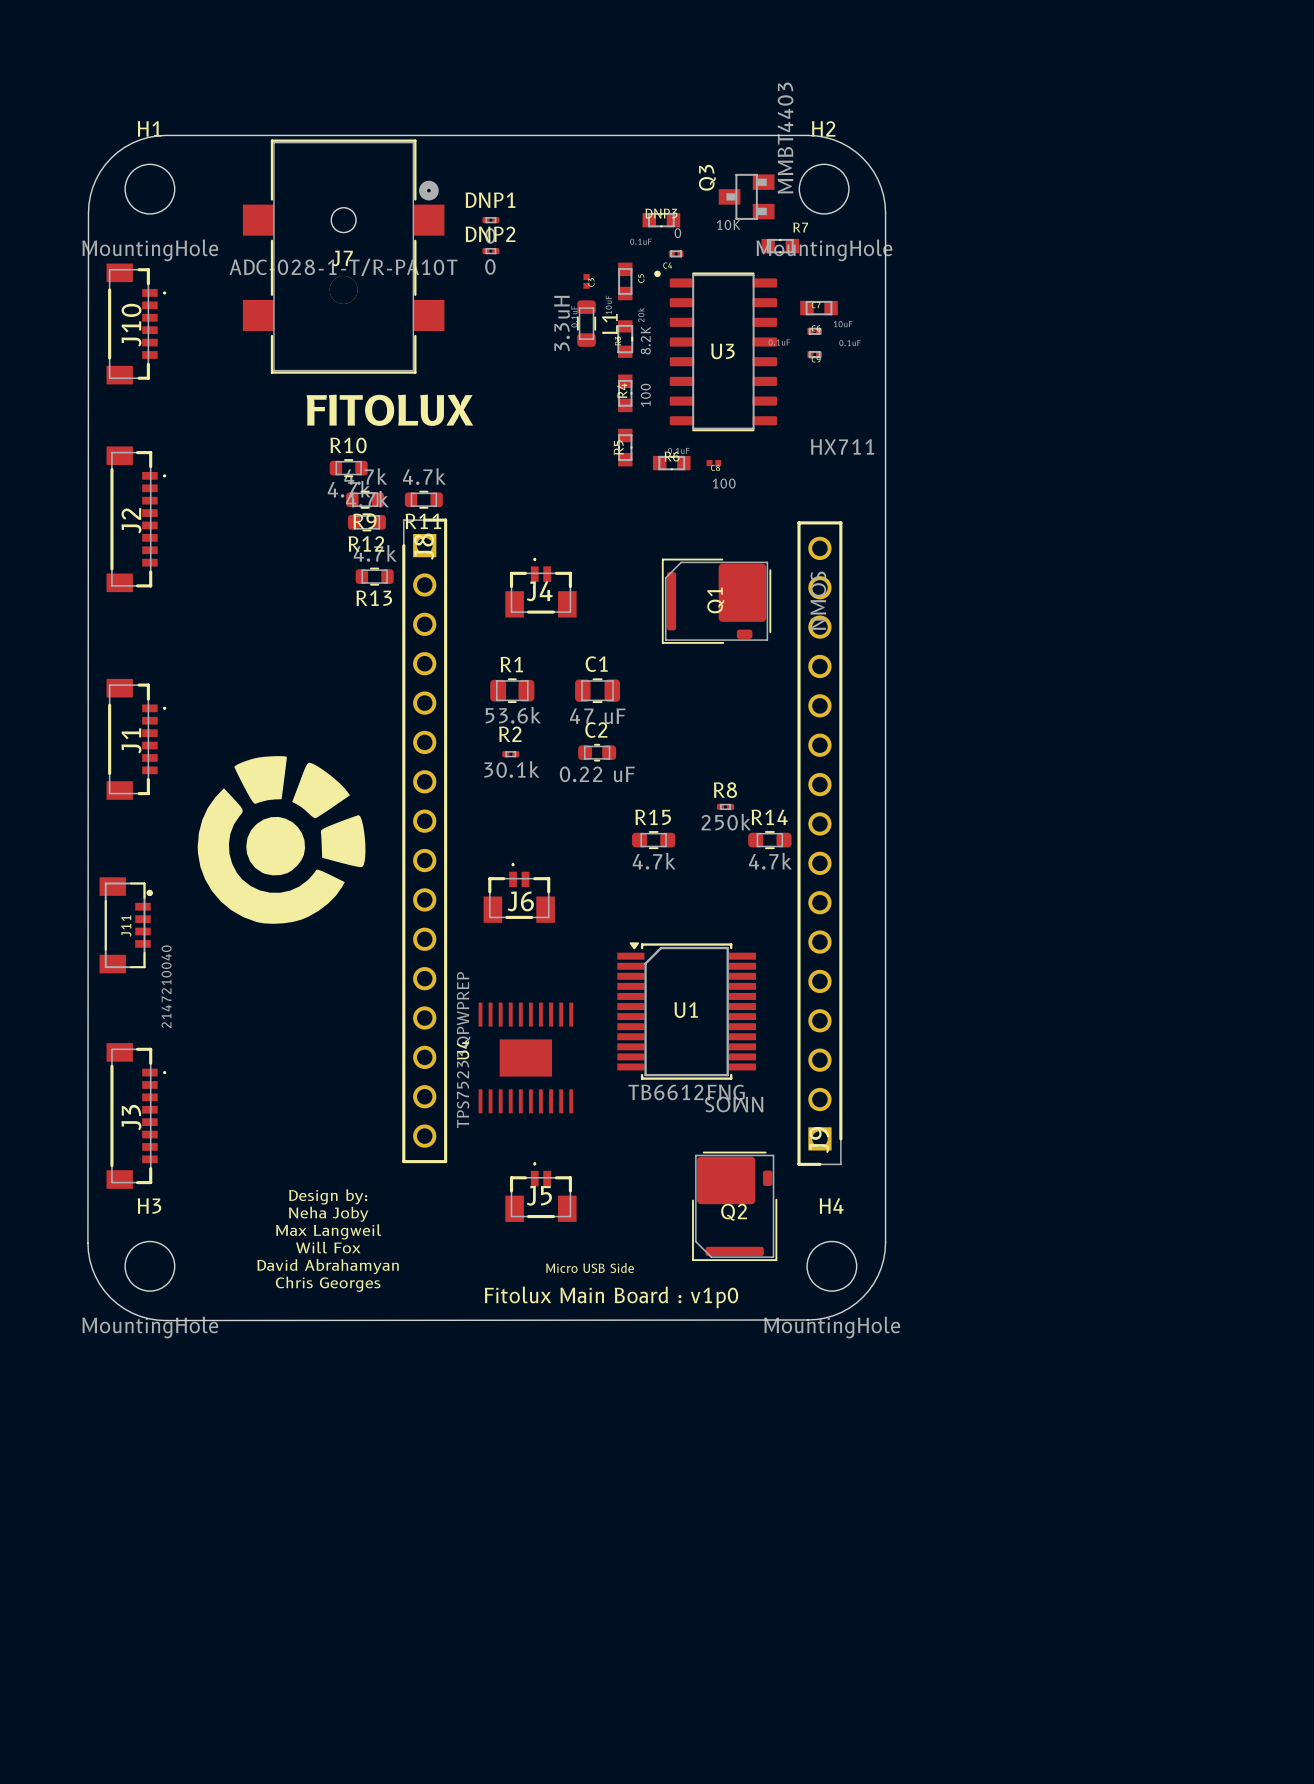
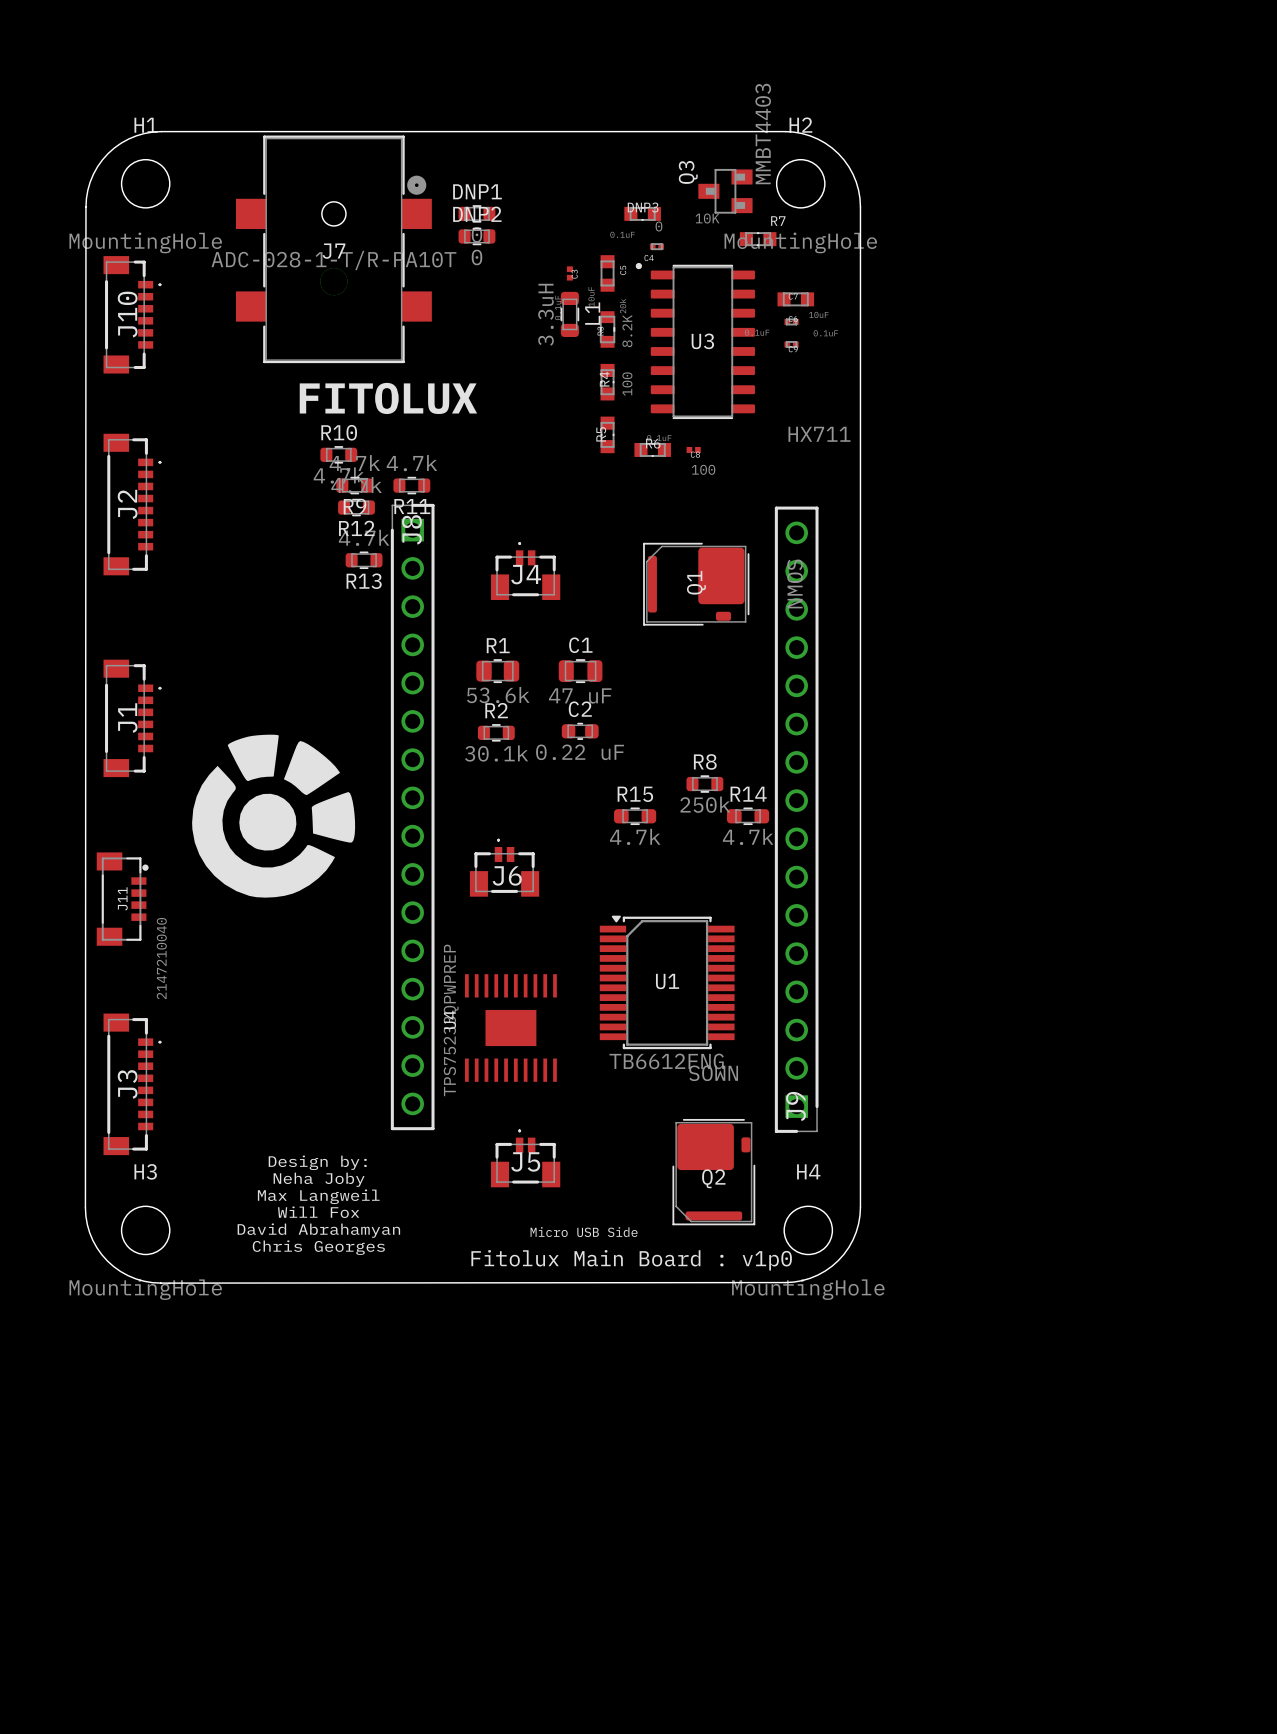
DNP1 footprint: [482, 217, 500, 224] -> [458, 205, 496, 223]
DNP2 footprint: [482, 248, 500, 255] -> [458, 227, 496, 246]
R2 footprint: [502, 751, 520, 758] -> [477, 724, 515, 742]
R8 footprint: [716, 803, 734, 811] -> [686, 775, 724, 793]

